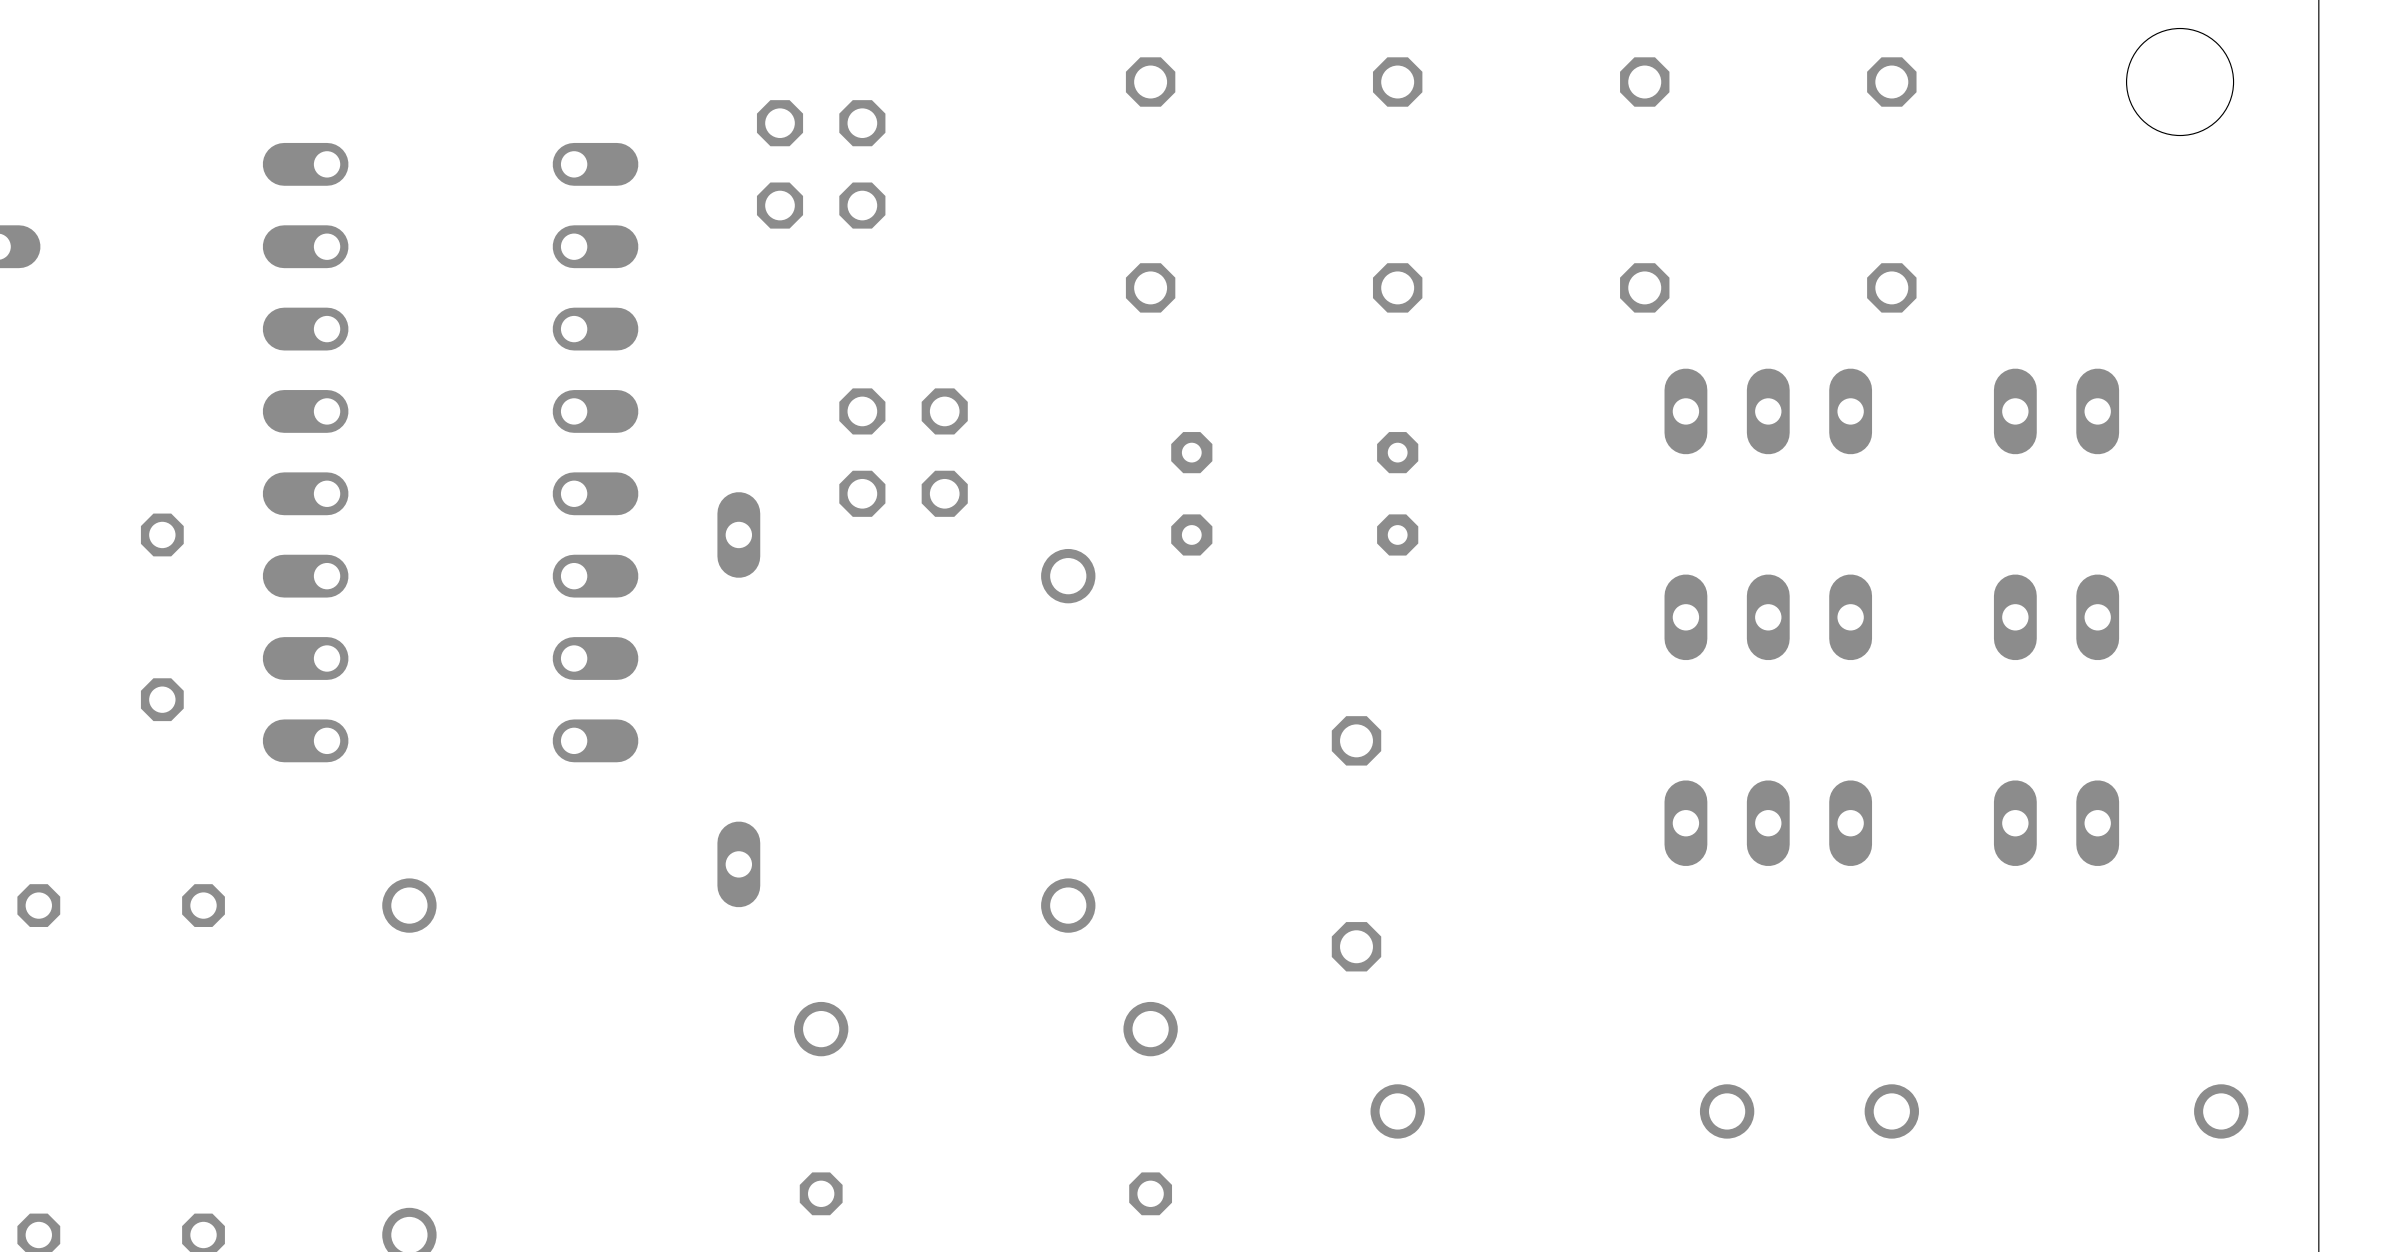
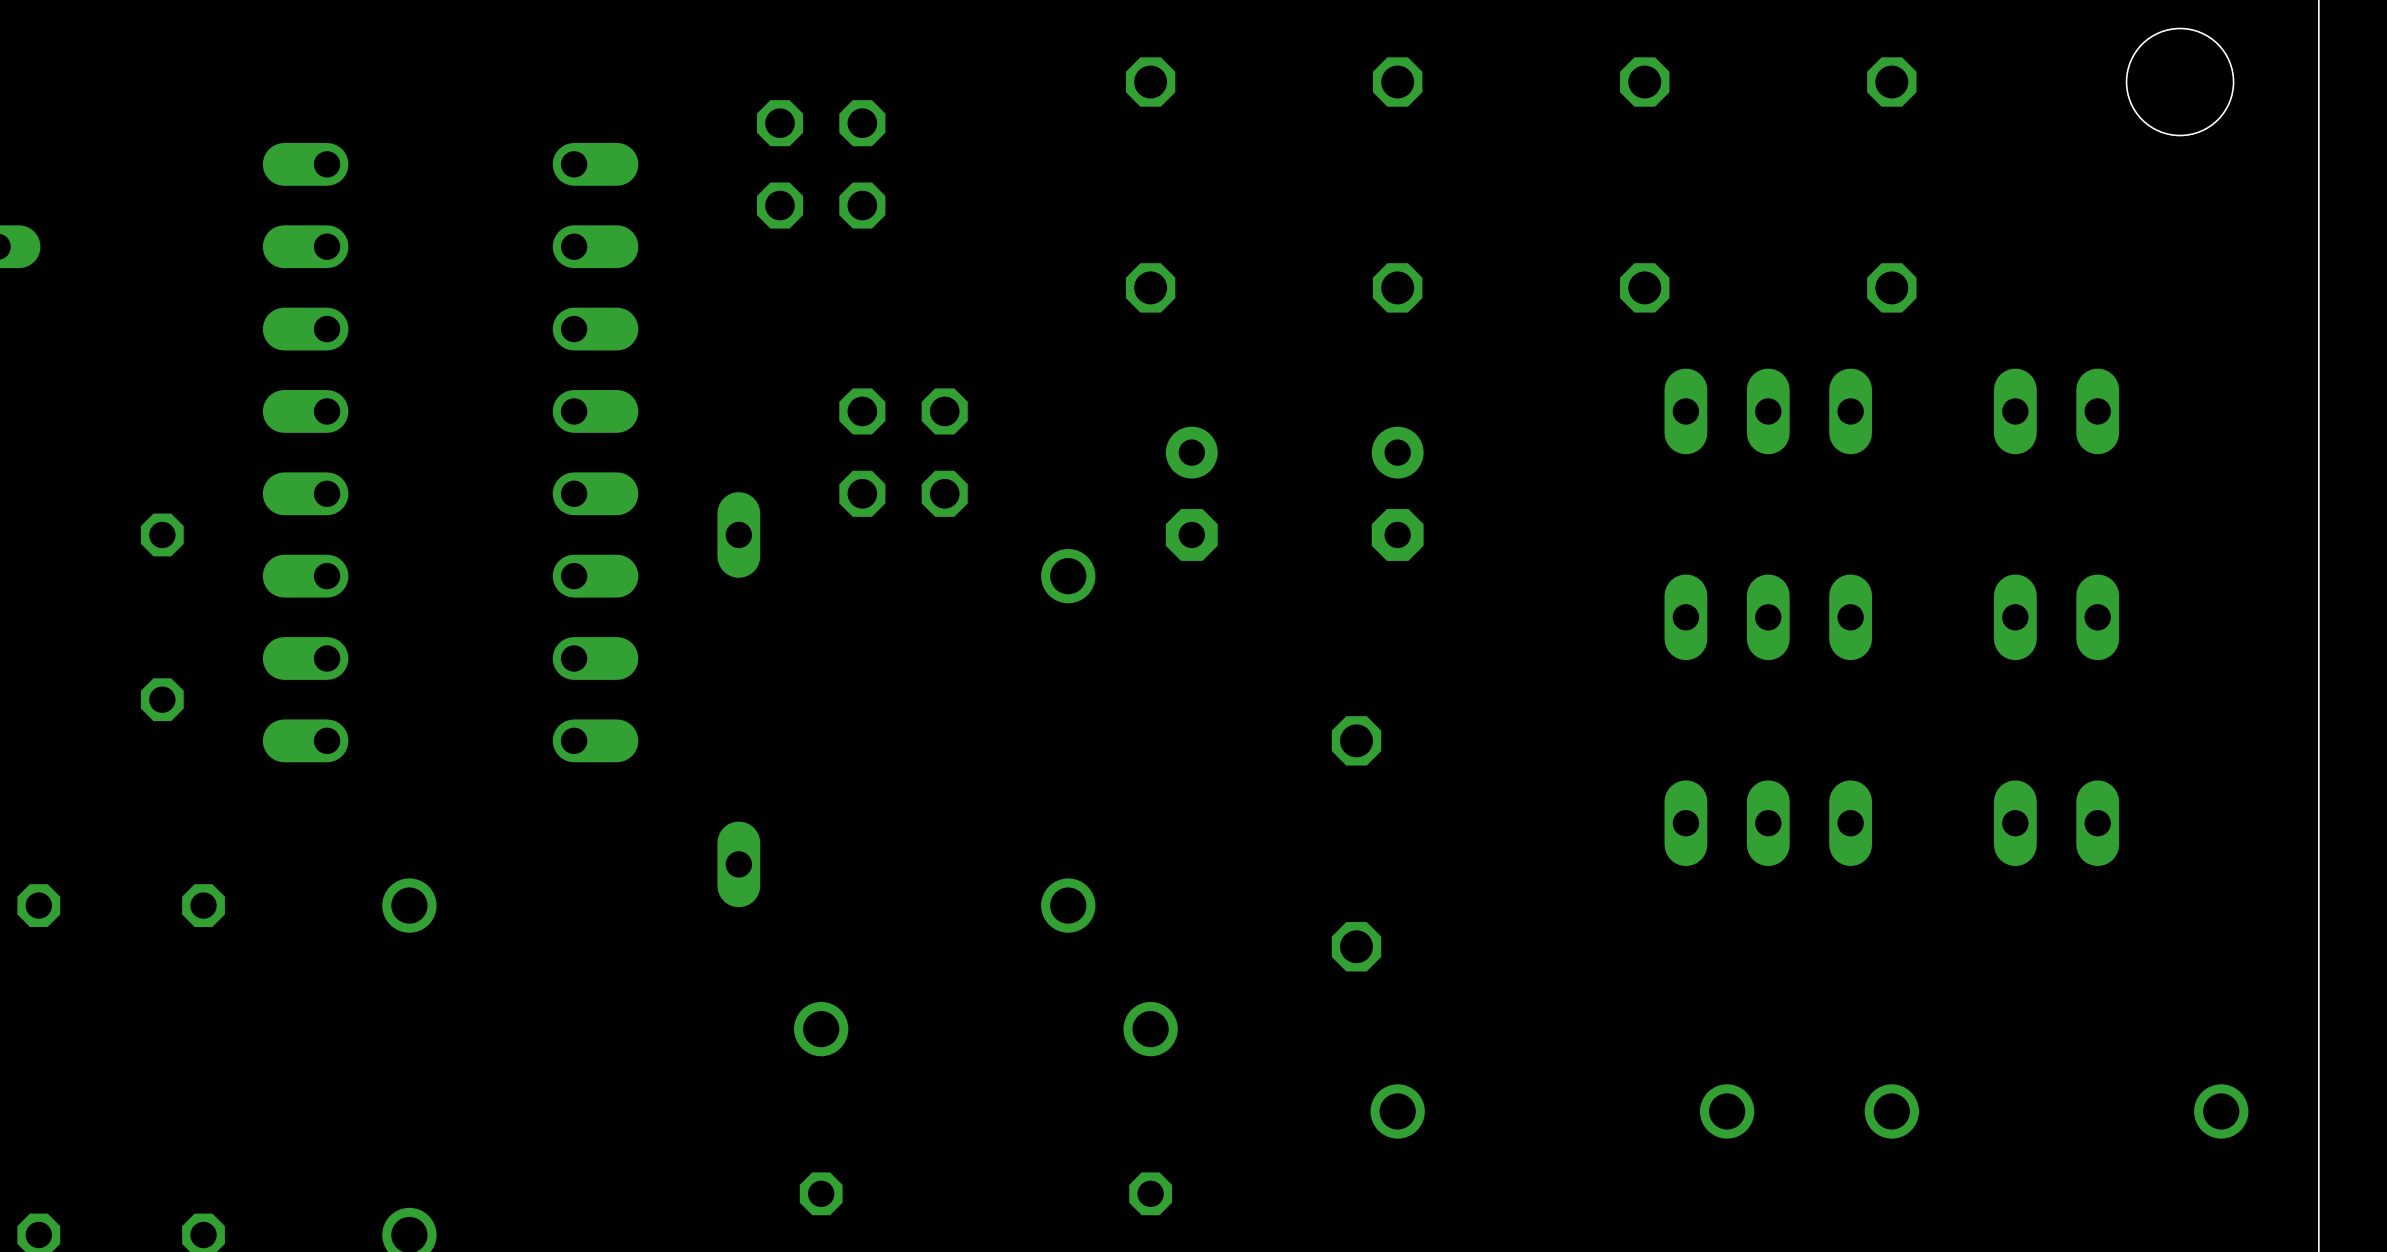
part footprint: [1171, 432, 1213, 556] -> [1165, 426, 1218, 561]
part footprint: [1377, 432, 1419, 556] -> [1371, 426, 1424, 561]

